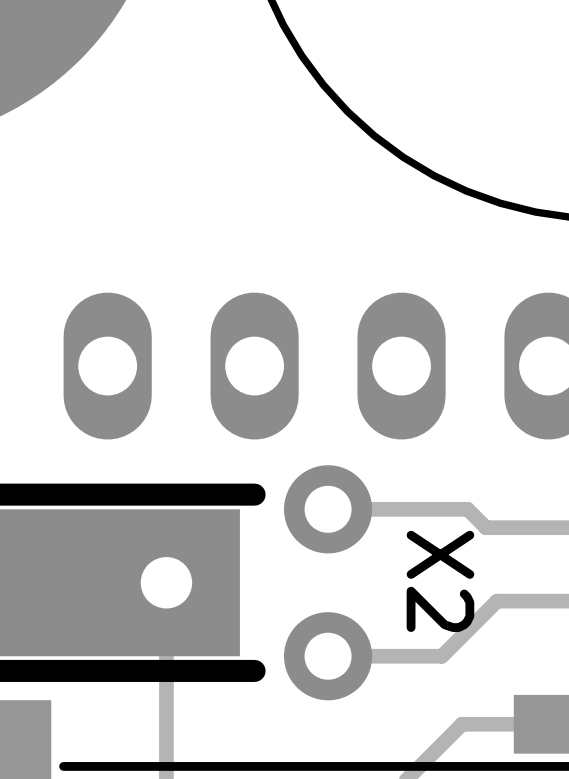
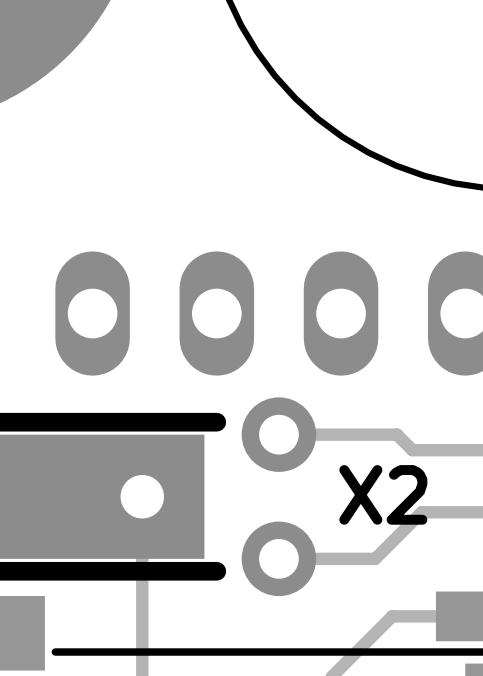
X2 name rotation: 0° (440, 581) -> 90° counterclockwise (383, 494)

